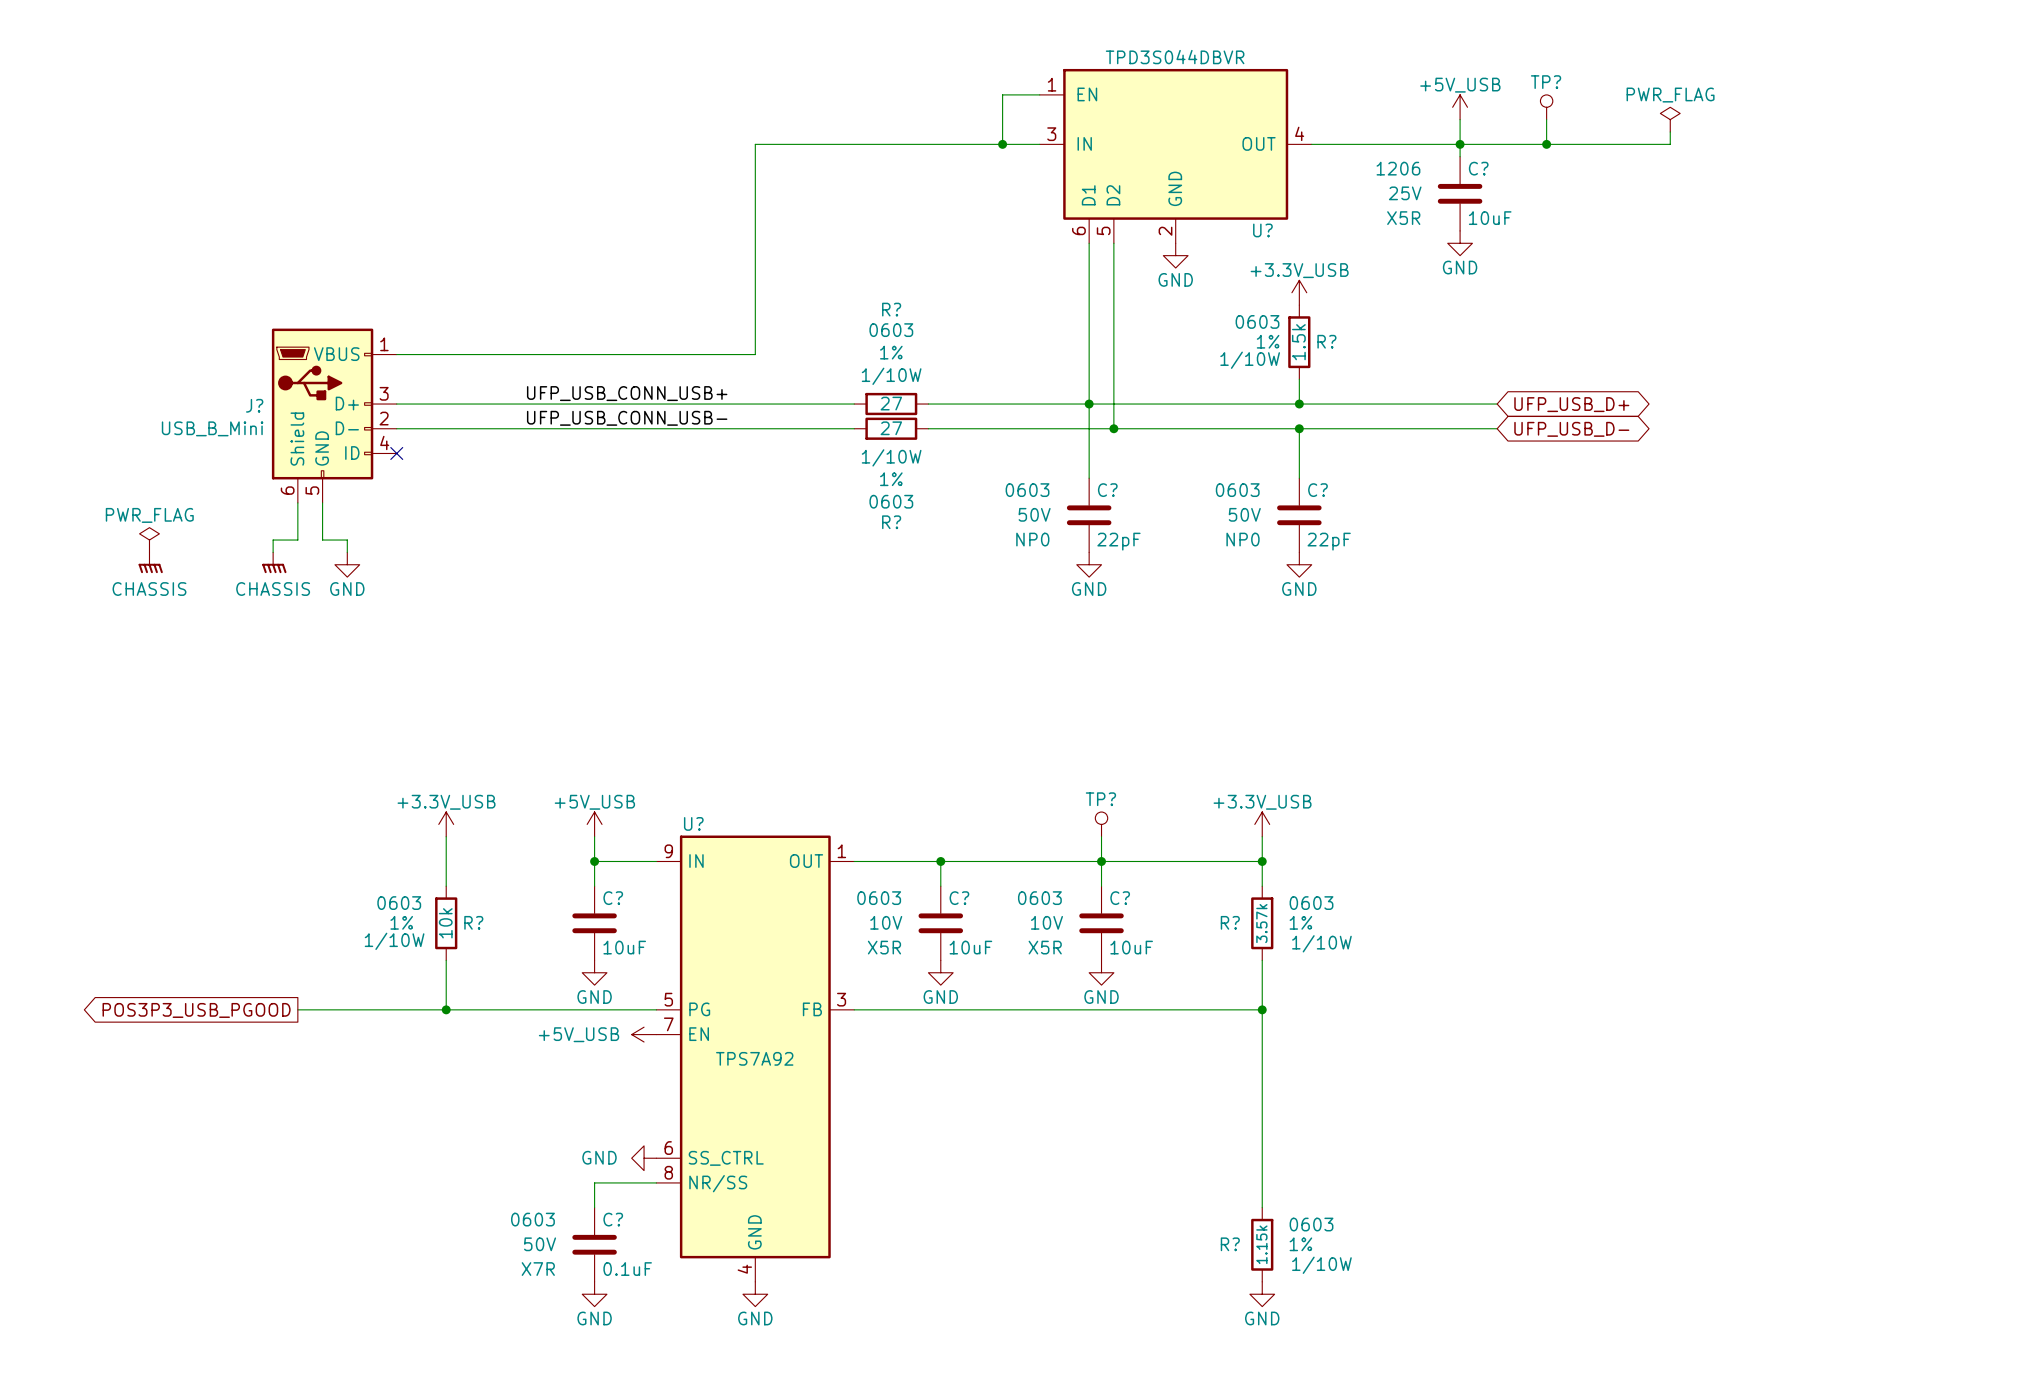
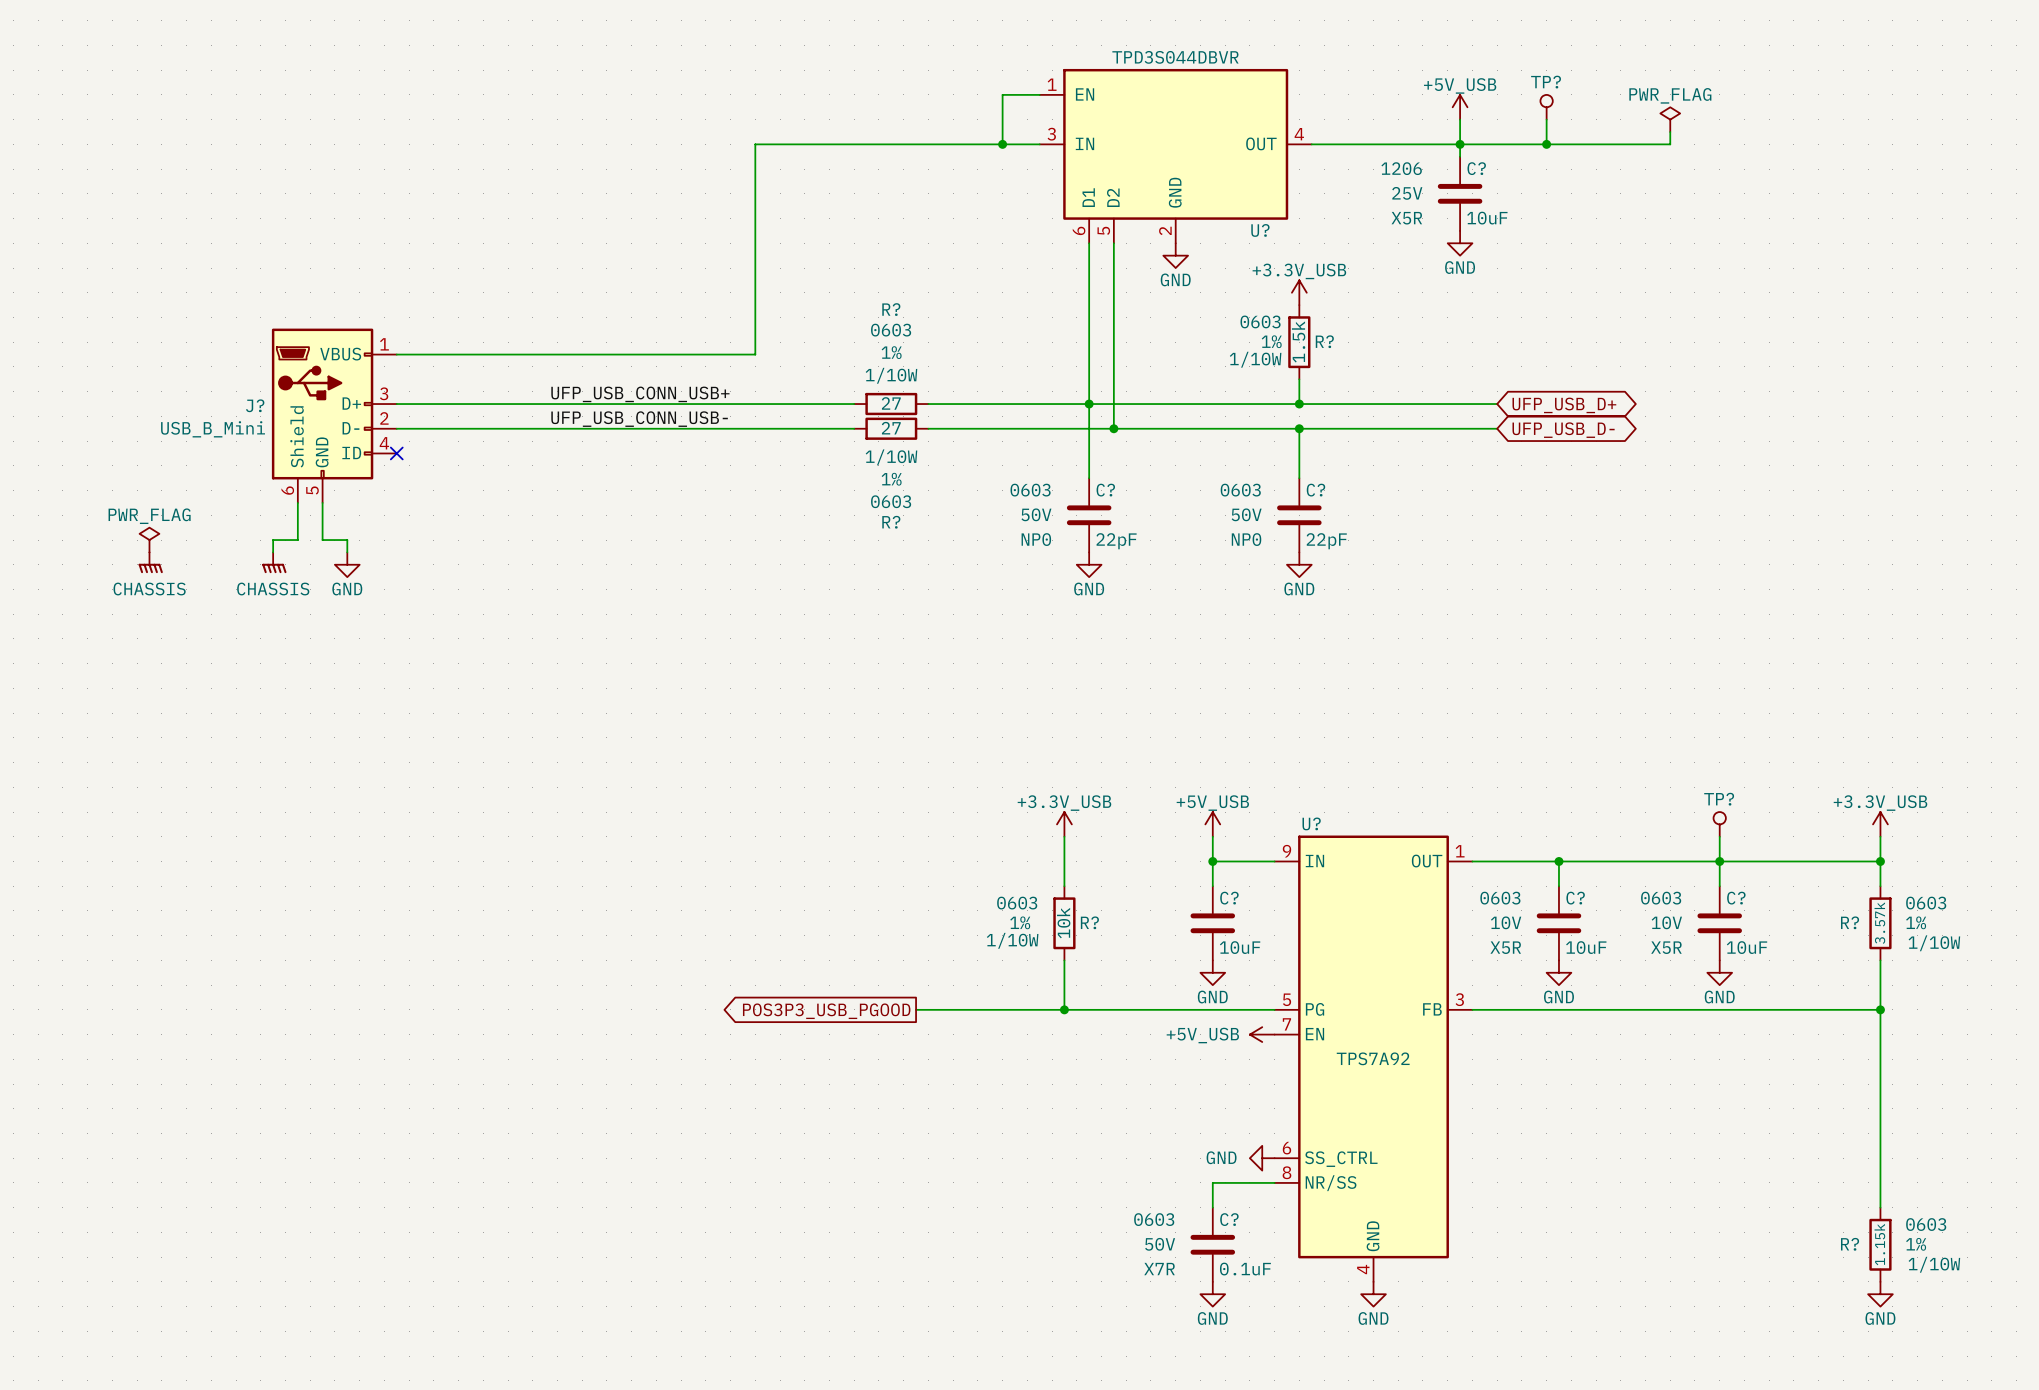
power symbol: +3.3V_USB (446, 824) -> none
power symbol: +5V_USB (594, 824) -> none
TP?: (1101, 824) -> none
power symbol: none -> +5V_USB (1212, 824)
power symbol position: +3.3V_USB (1262, 824) -> +3.3V_USB (1064, 824)
TP?: none -> (1719, 824)
power symbol: none -> +3.3V_USB (1880, 824)
wire: (446, 836) (446, 886) -> none
wire: (594, 836) (594, 886) -> none
wire: (1101, 836) (1101, 886) -> (1064, 836) (1064, 886)
wire: (1262, 836) (1262, 886) -> (1212, 836) (1212, 886)
wire: none -> (1719, 836) (1719, 886)
wire: none -> (1880, 836) (1880, 886)
wire: (594, 861) (656, 861) -> none
junction: (594, 861) -> none
wire: (854, 861) (1212, 861) -> none
wire: (940, 861) (940, 886) -> none
junction: (940, 861) -> none
junction: (1101, 861) -> none
wire: none -> (1262, 861) (1274, 861)
junction position: (1262, 861) -> (1212, 861)
wire: none -> (1472, 861) (1880, 861)
wire: none -> (1558, 861) (1558, 886)
junction: none -> (1558, 861)
junction: none -> (1719, 861)
junction: none -> (1880, 861)
R?: 10k (446, 923) -> none
C?: 10uF (594, 923) -> none
C?: 10uF (940, 923) -> none
R?: none -> 10k (1064, 923)
C?: 10uF (1101, 923) -> none
C?: none -> 10uF (1212, 923)
R?: 3.57k (1262, 923) -> none
C?: none -> 10uF (1558, 923)
C?: none -> 10uF (1719, 923)
R?: none -> 3.57k (1880, 923)
wire: (446, 960) (446, 1009) -> none
wire: none -> (1064, 960) (1064, 1009)
wire: (1262, 960) (1262, 1207) -> none
wire: none -> (1880, 960) (1880, 1207)
power symbol: GND (594, 972) -> none
power symbol: GND (940, 972) -> none
power symbol position: GND (1101, 972) -> GND (1212, 972)
power symbol: none -> GND (1558, 972)
power symbol: none -> GND (1719, 972)
wire: (297, 1009) (656, 1009) -> none
junction: (446, 1009) -> none
wire: (854, 1009) (916, 1009) -> none
junction: none -> (1064, 1009)
wire: none -> (1262, 1009) (1274, 1009)
junction: (1262, 1009) -> none
wire: none -> (1472, 1009) (1880, 1009)
junction: none -> (1880, 1009)
global label: POS3P3_USB_PGOOD (196, 1010) -> none
global label: none -> POS3P3_USB_PGOOD (826, 1011)
power symbol: +5V_USB (644, 1034) -> none
power symbol: none -> +5V_USB (1262, 1034)
U?: TPS7A92 (755, 1058) -> none
U?: none -> TPS7A92 (1373, 1058)
power symbol: GND (644, 1158) -> none
power symbol: none -> GND (1262, 1158)
wire: (656, 1182) (594, 1182) (594, 1207) -> none
wire: none -> (1274, 1182) (1212, 1182) (1212, 1207)
C?: 0.1uF (594, 1244) -> none
C?: none -> 0.1uF (1212, 1244)
R?: 1.15k (1262, 1244) -> none
R?: none -> 1.15k (1880, 1244)
power symbol: GND (594, 1294) -> none
power symbol: GND (755, 1294) -> none
power symbol position: GND (1262, 1294) -> GND (1212, 1294)
power symbol: none -> GND (1373, 1294)
power symbol: none -> GND (1880, 1294)

